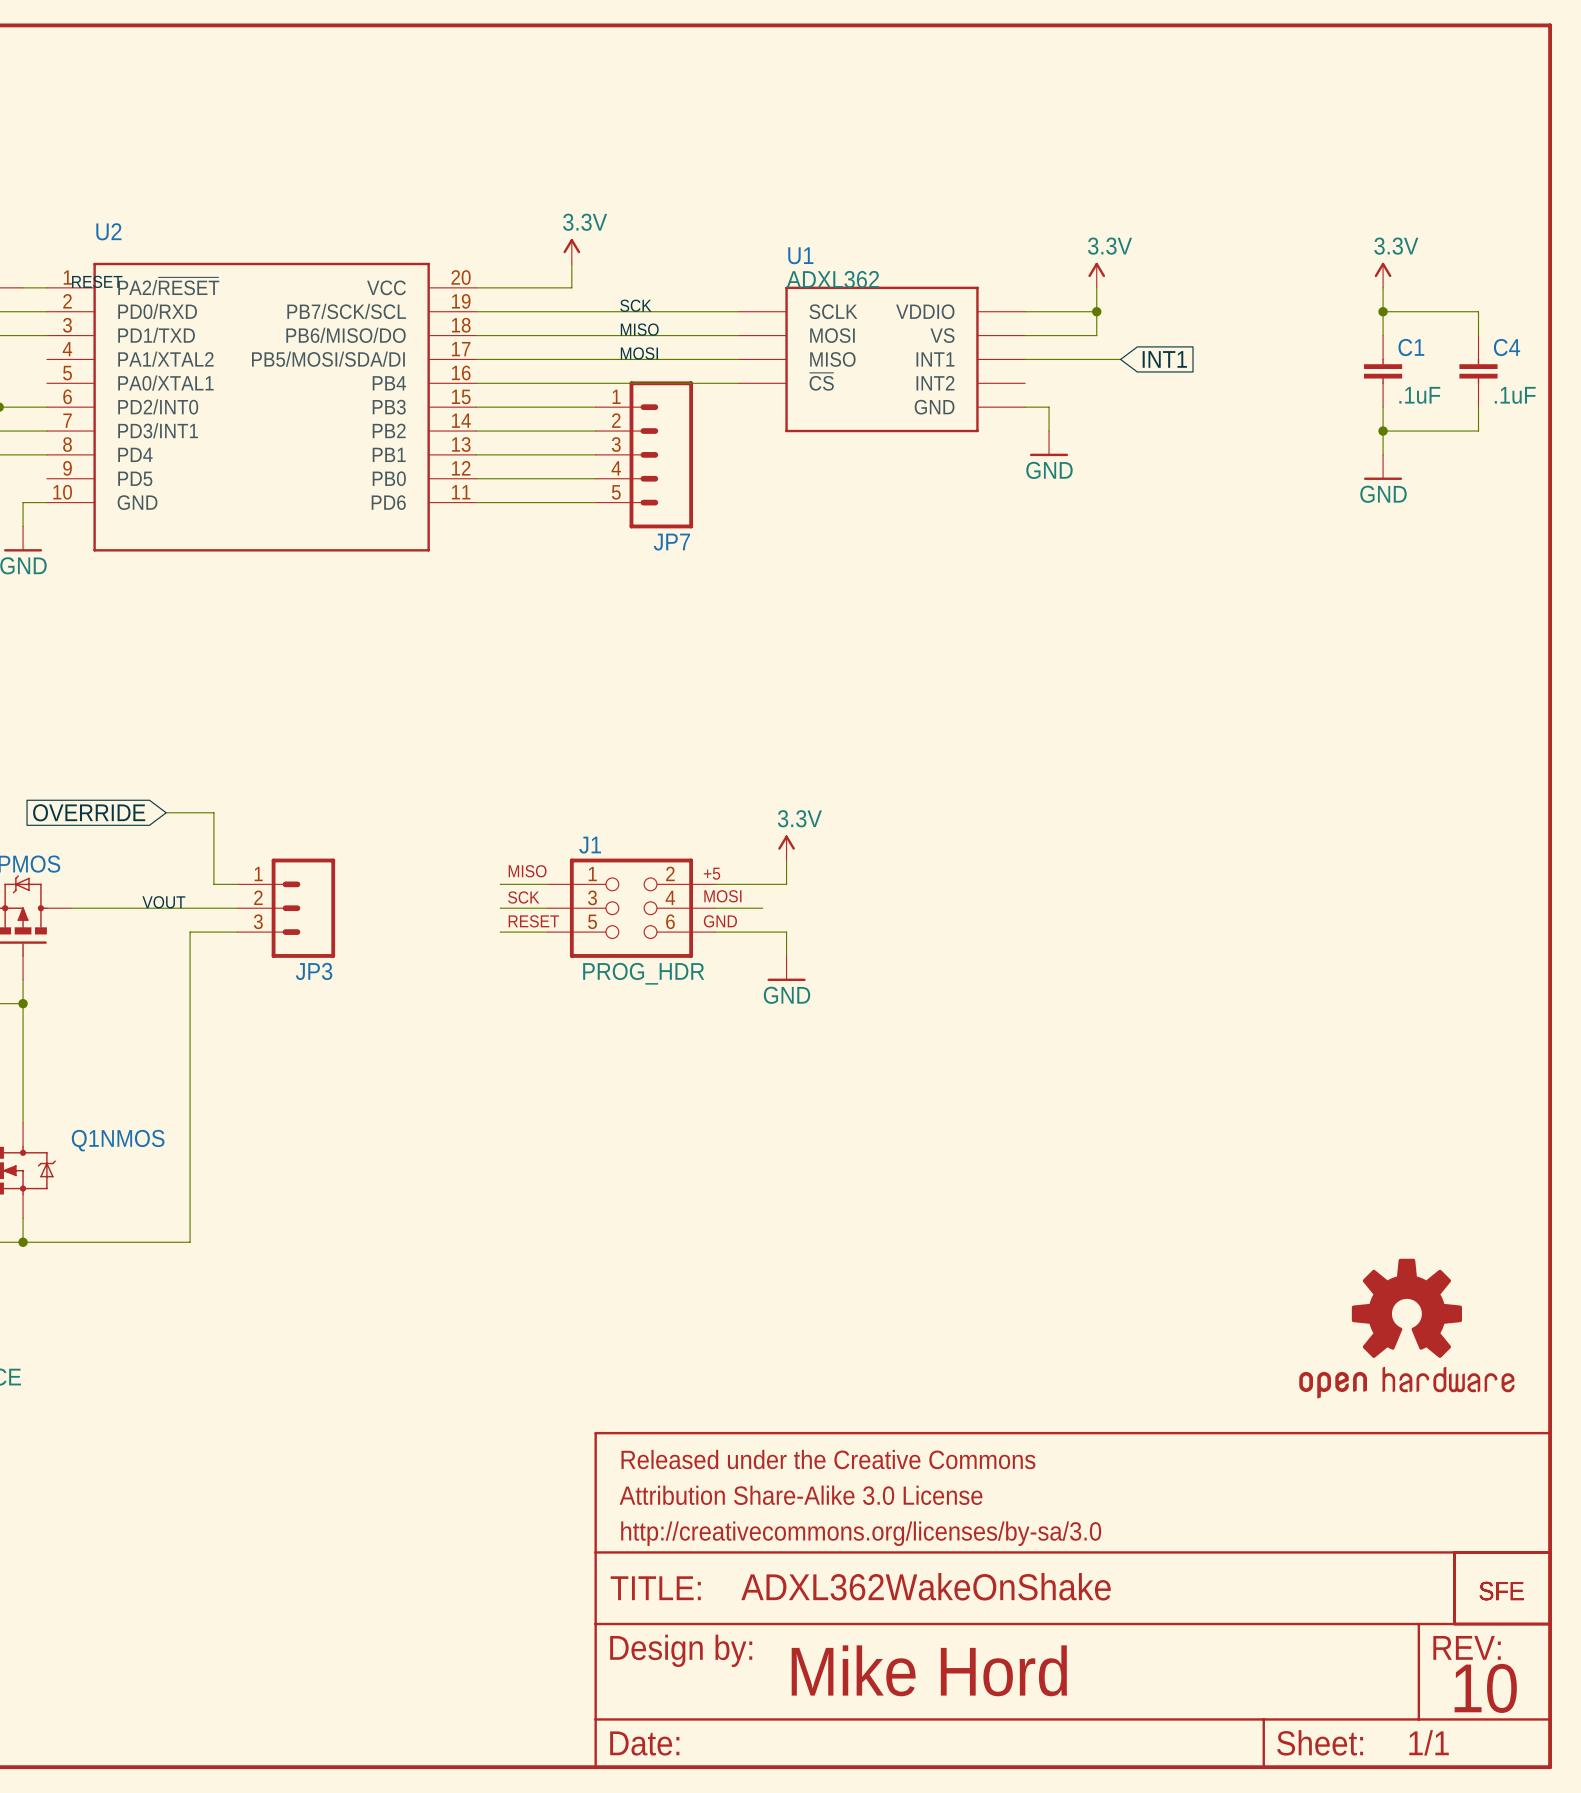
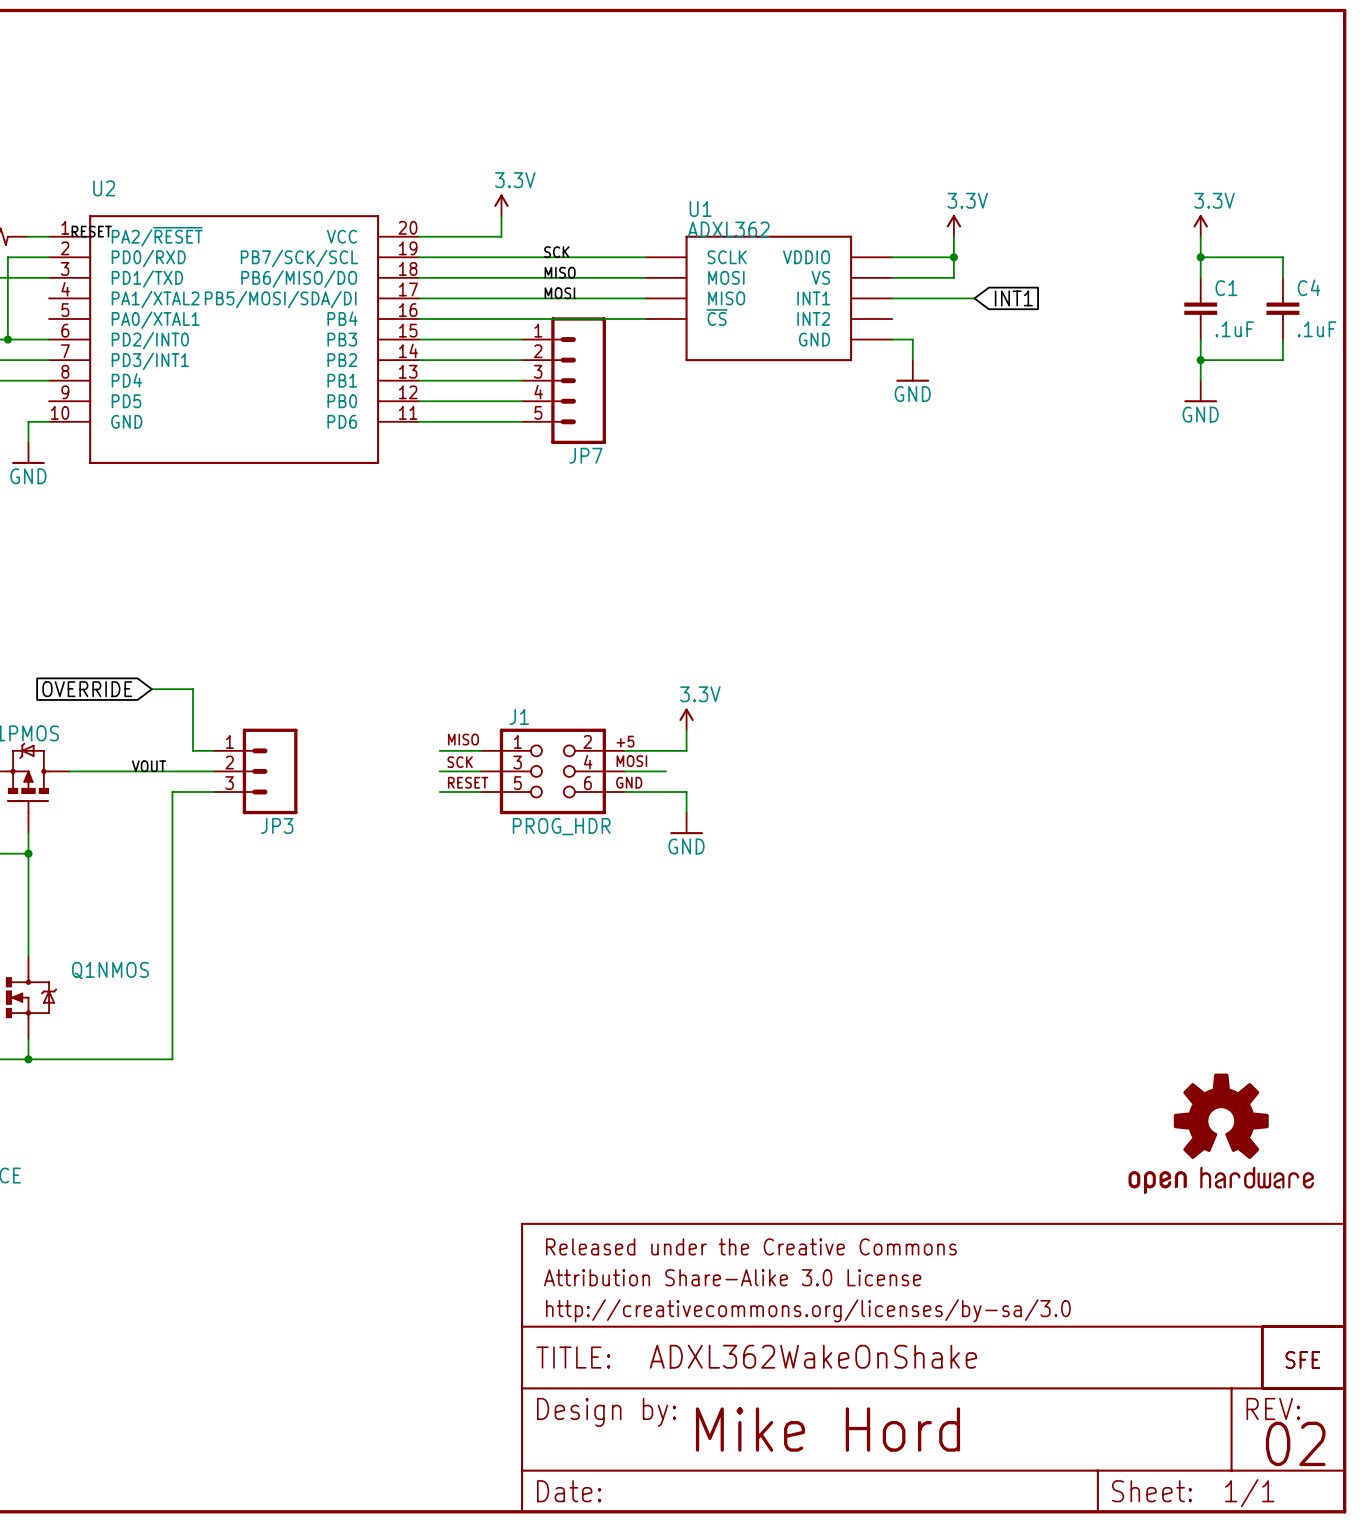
text: 10 (1485, 1688) -> 02 (1295, 1443)

